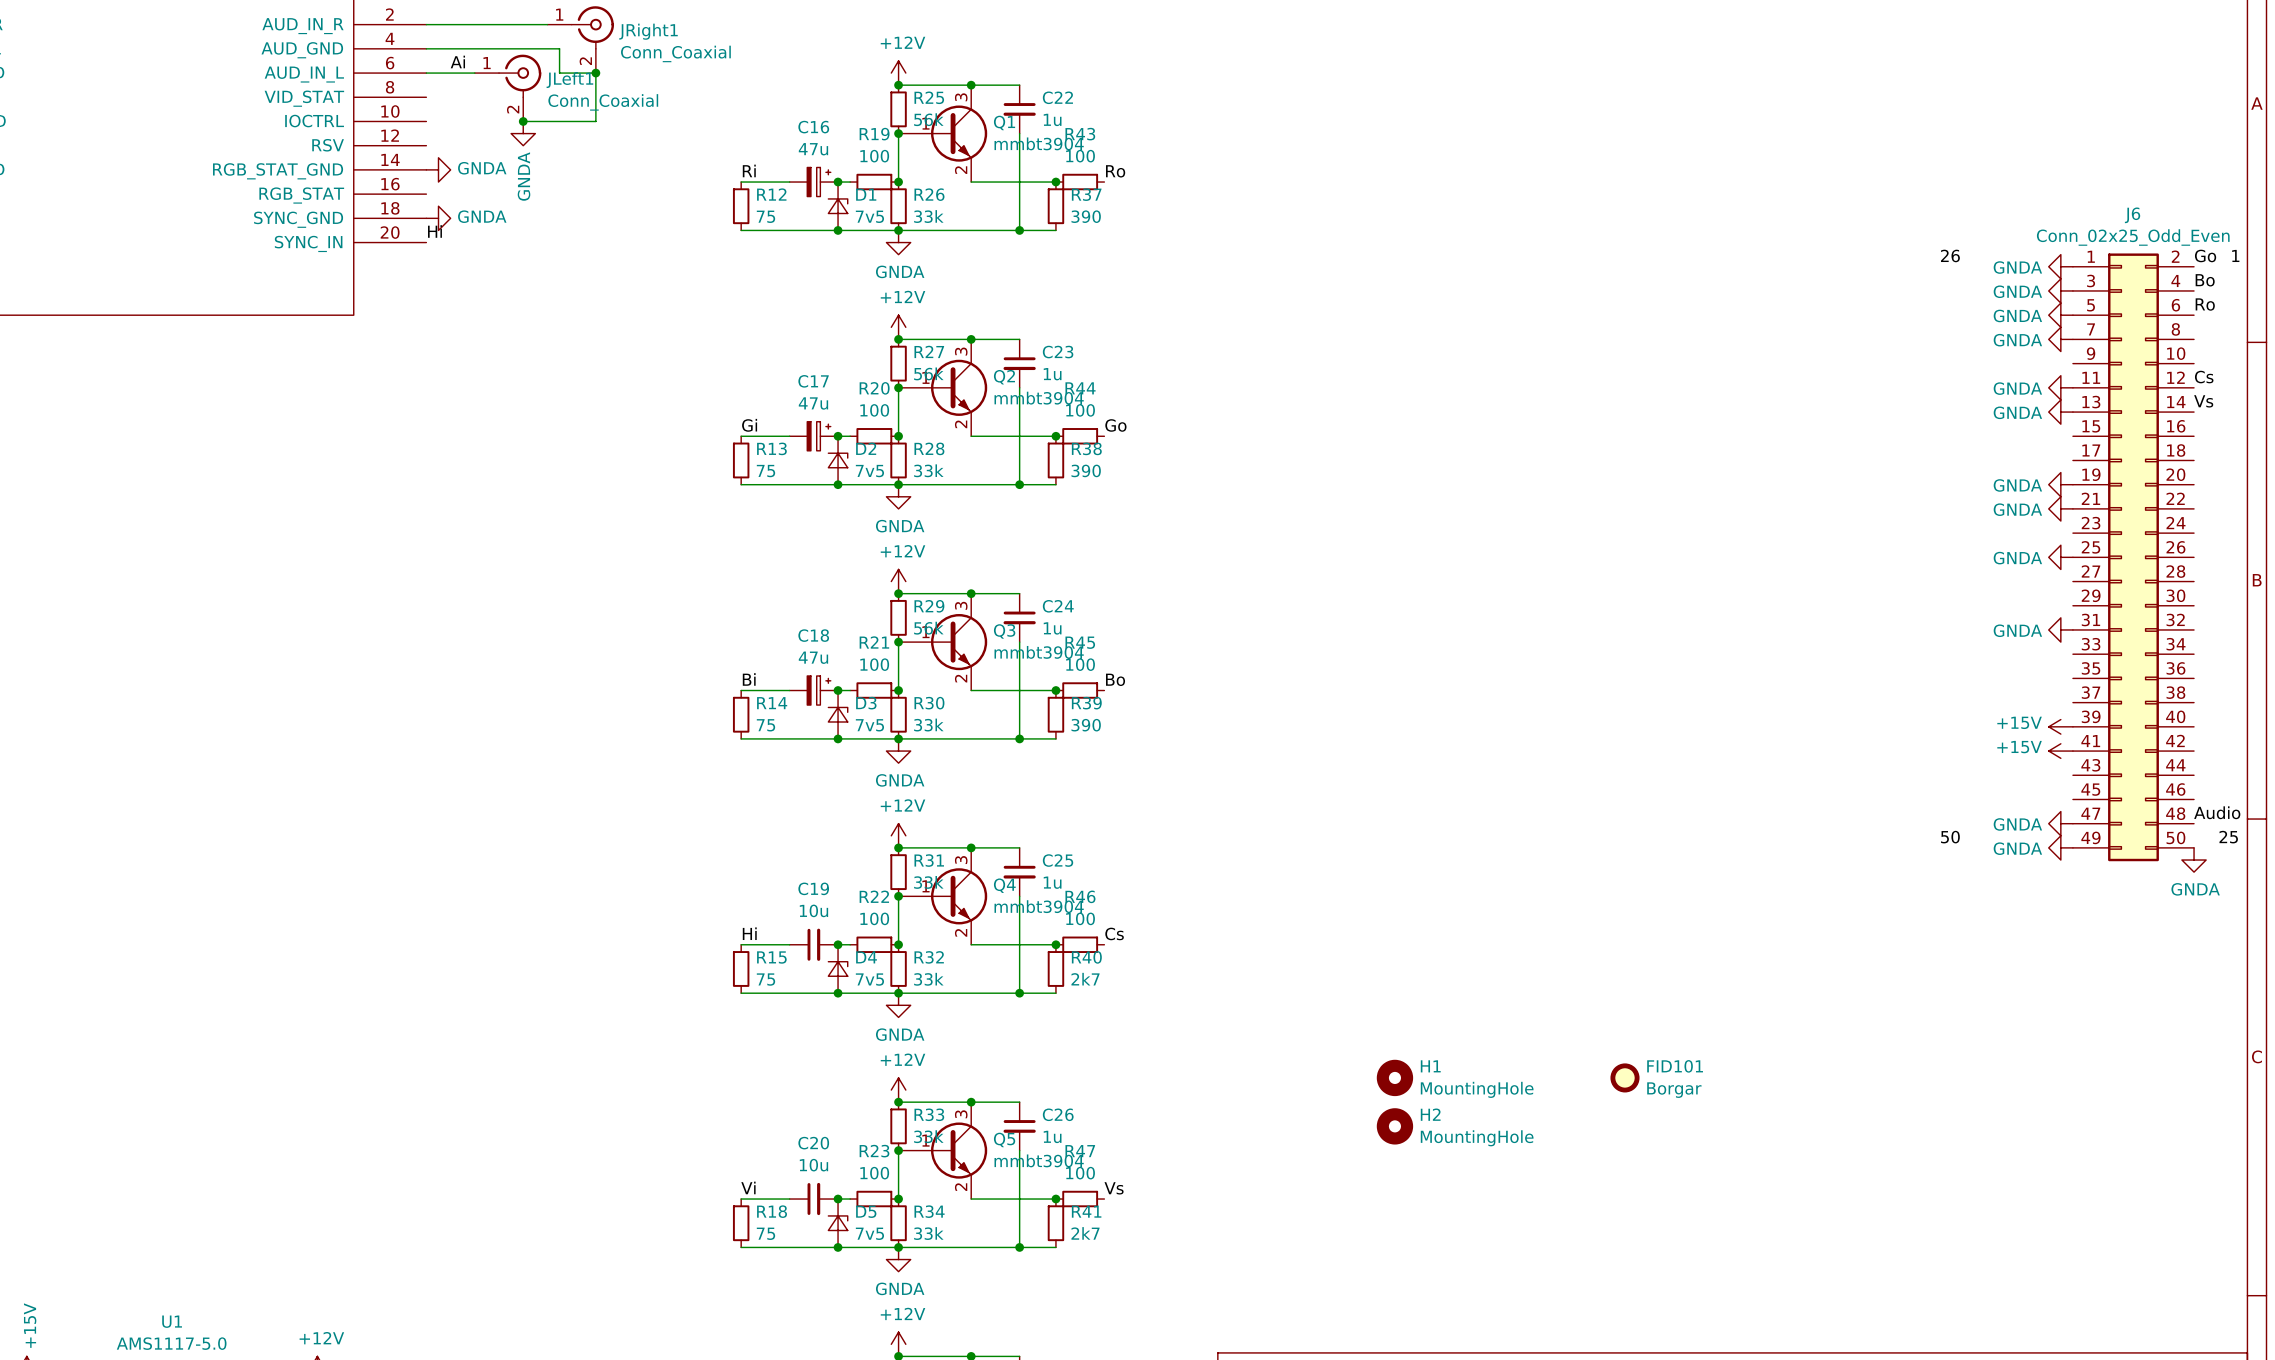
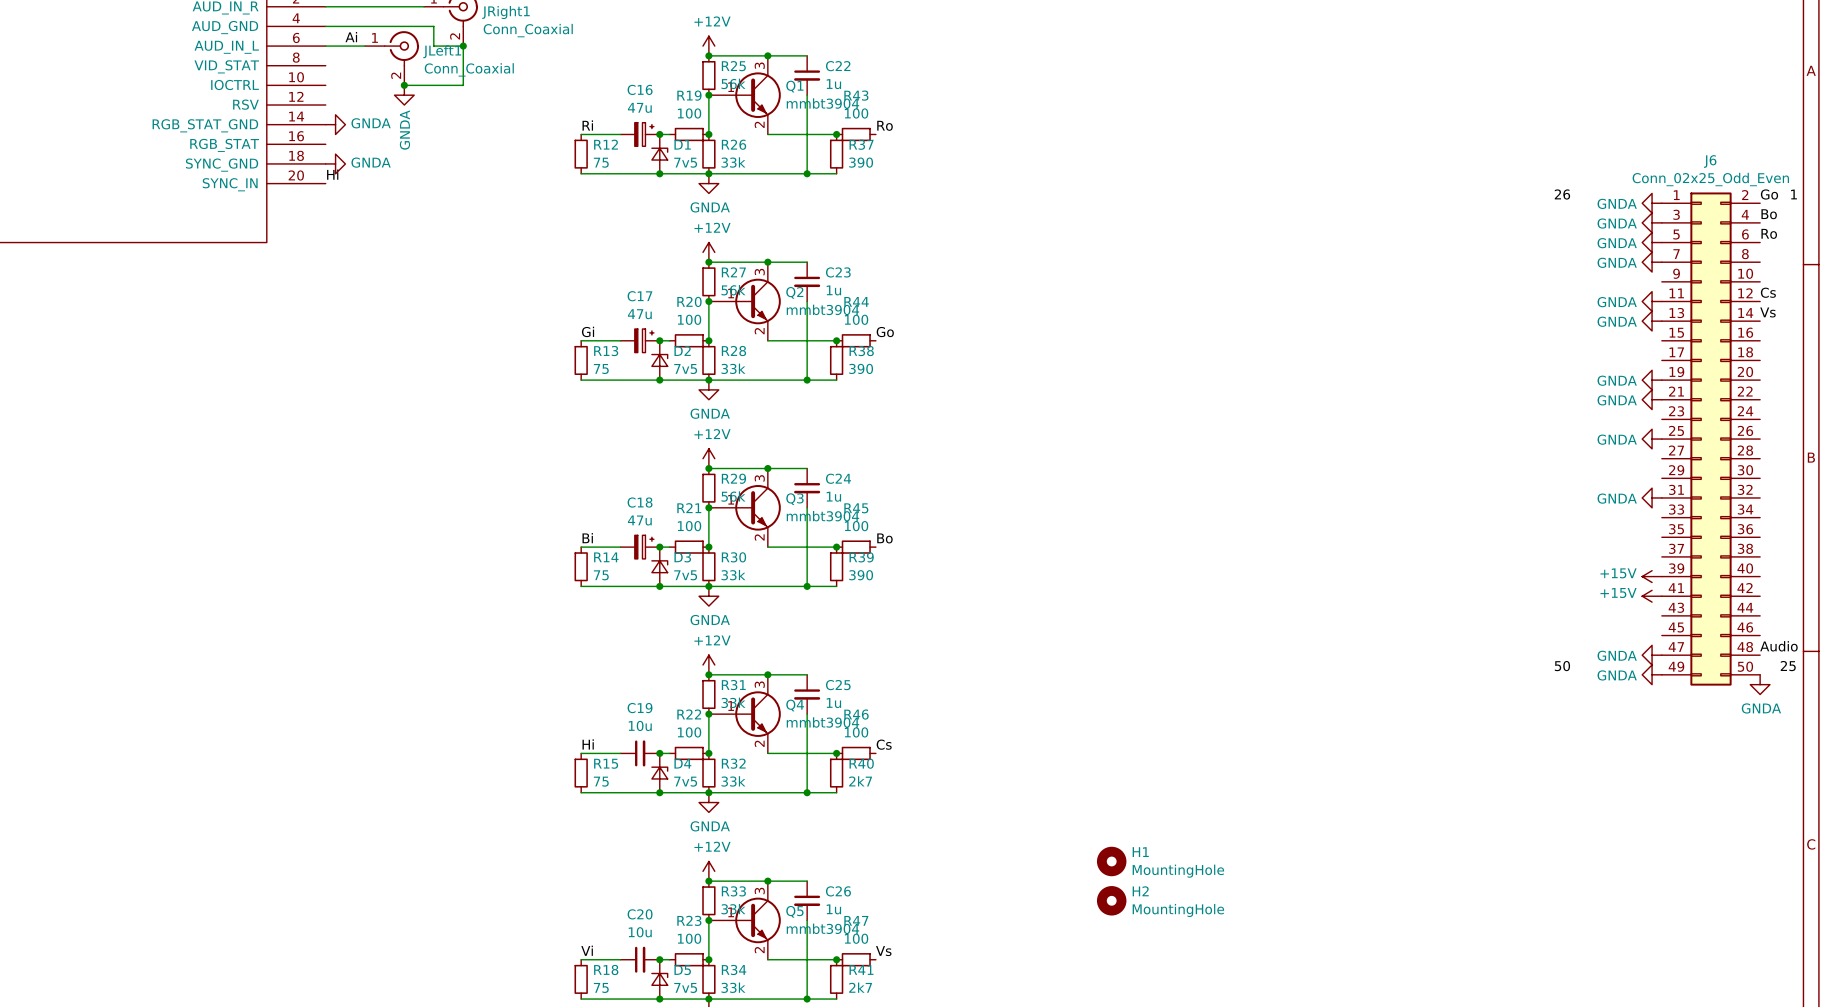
FID101: Borgar (1624, 1077) -> none

